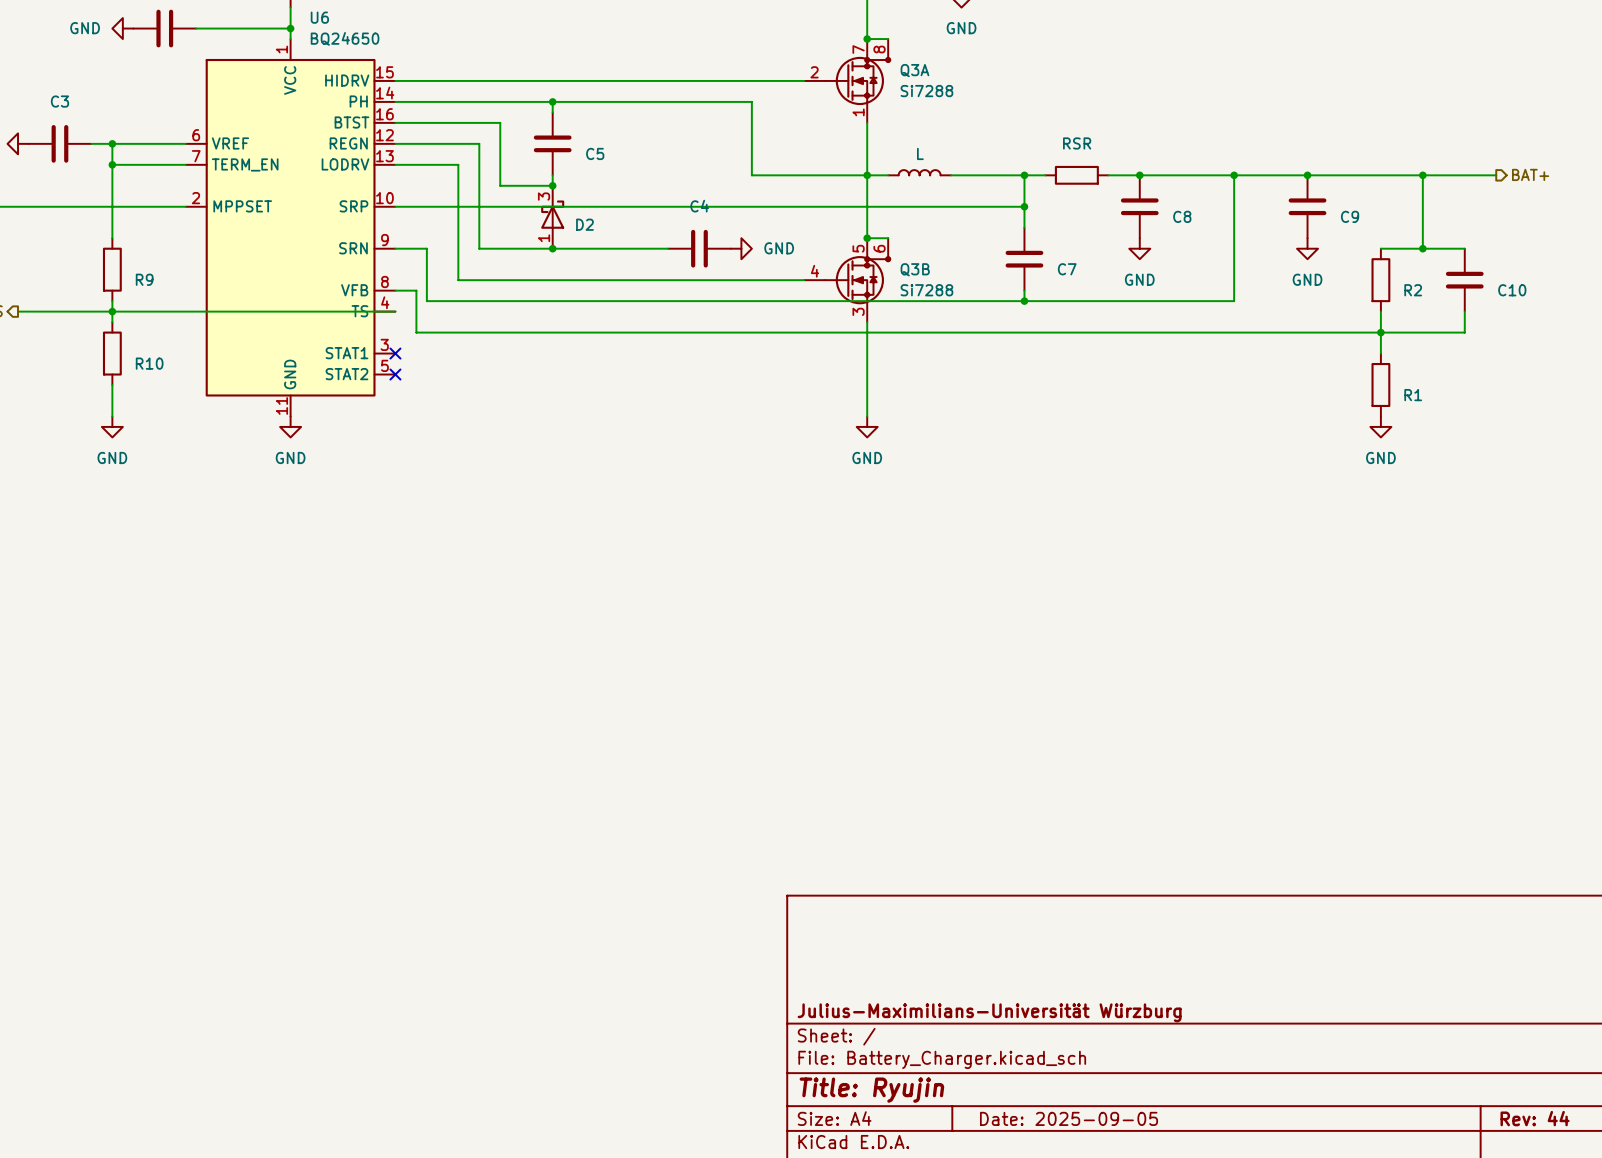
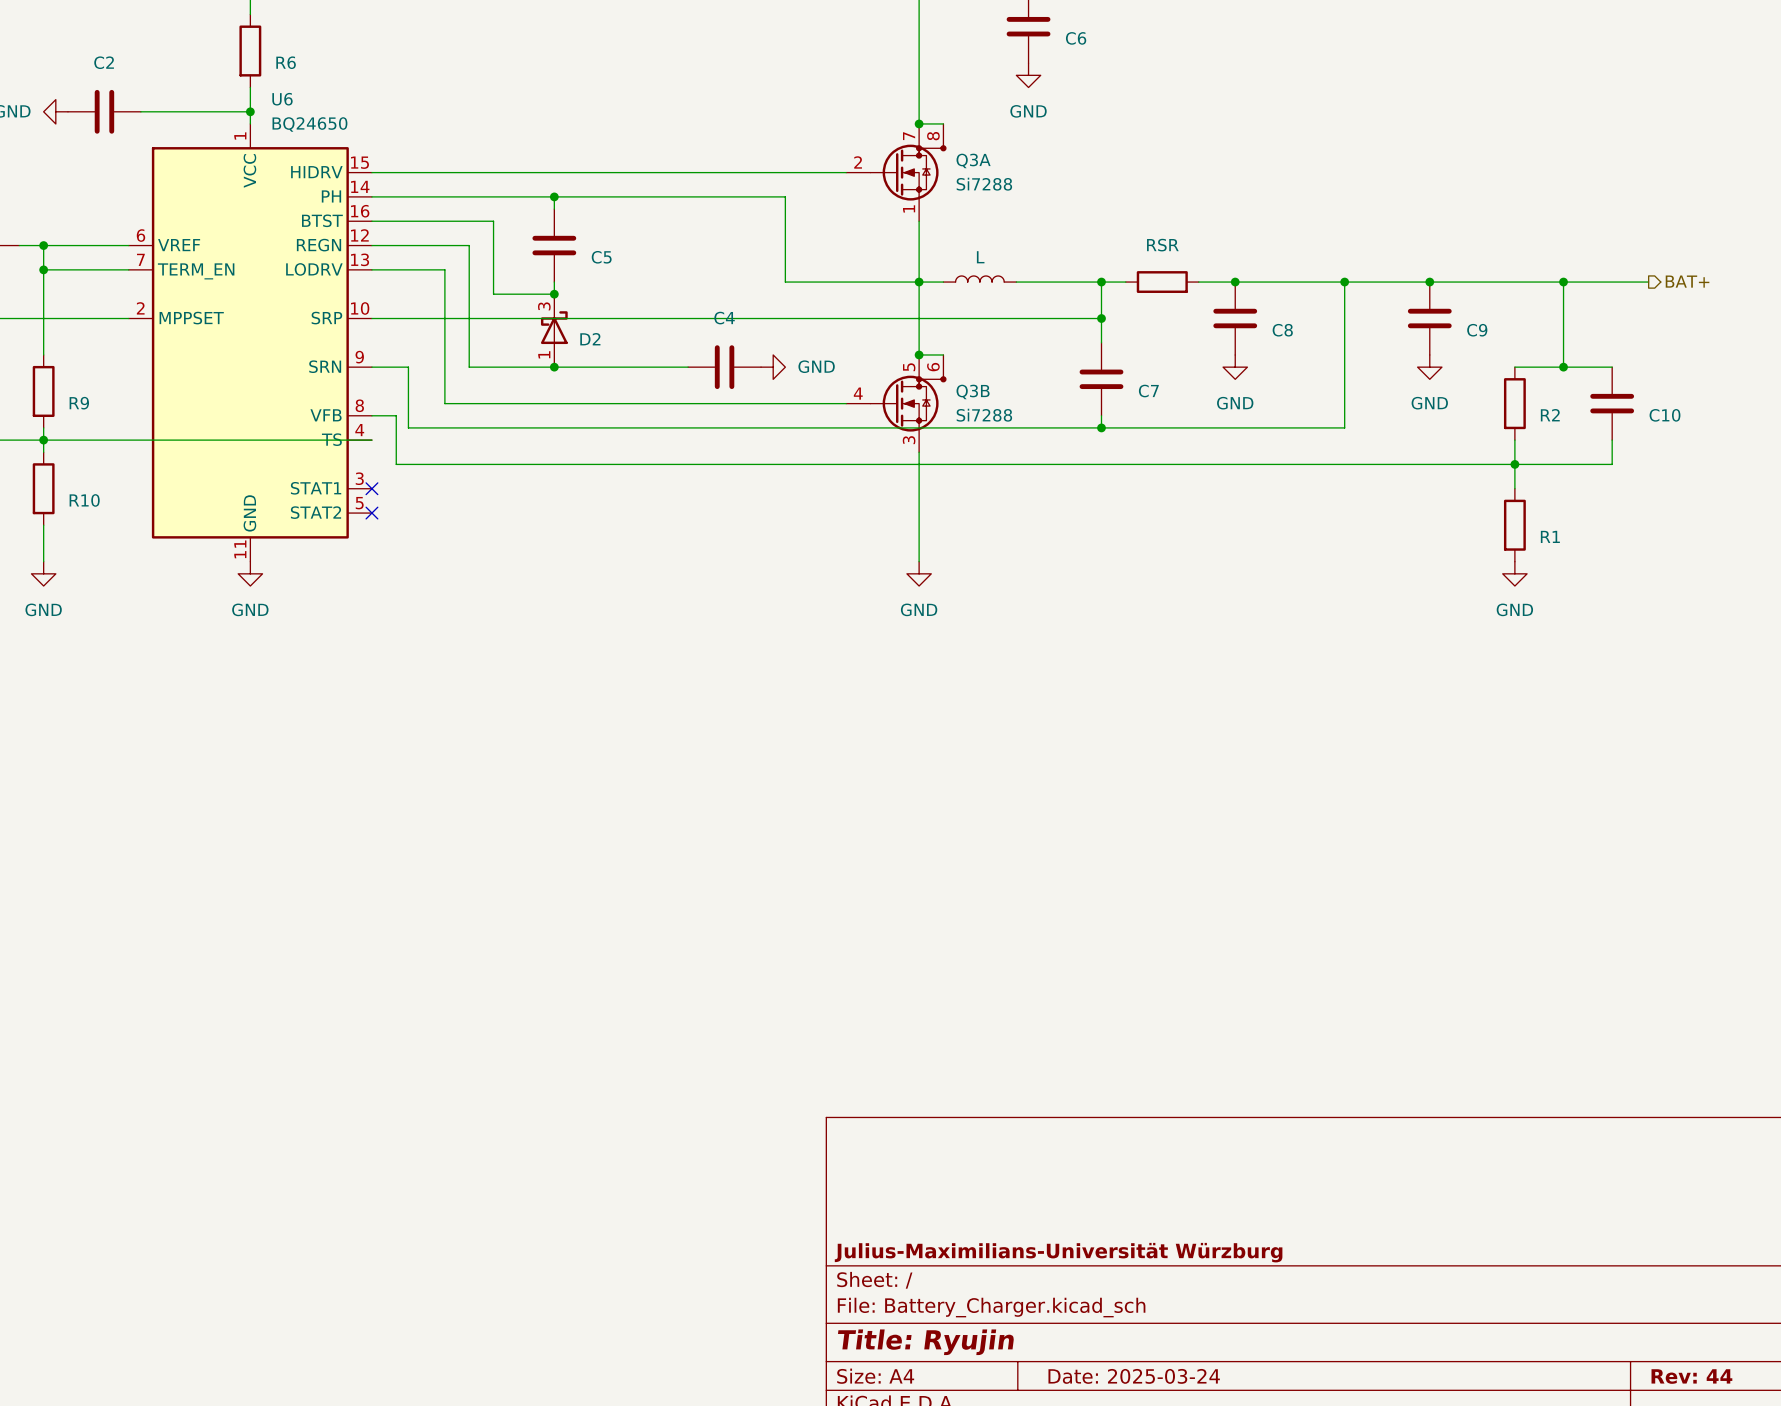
title block: Date: 2025-09-05 (1069, 1118) -> Date: 2025-03-24 (1134, 1376)

